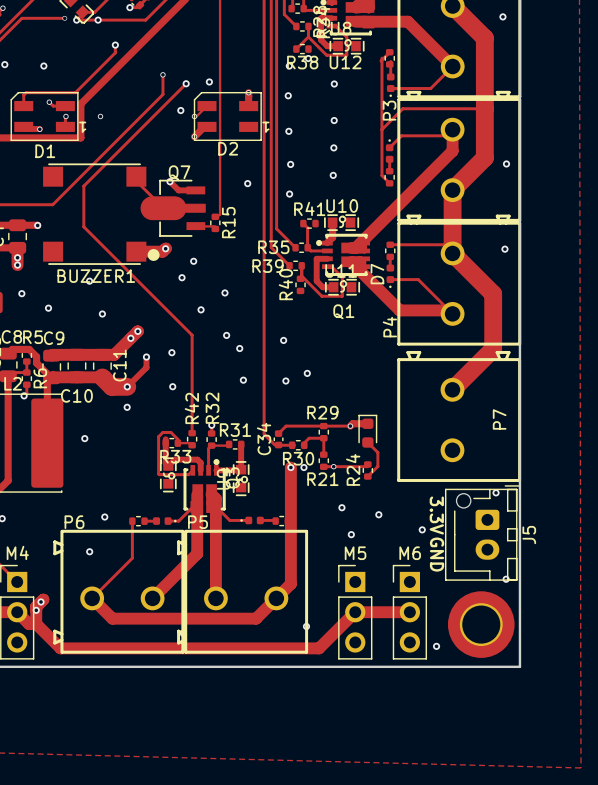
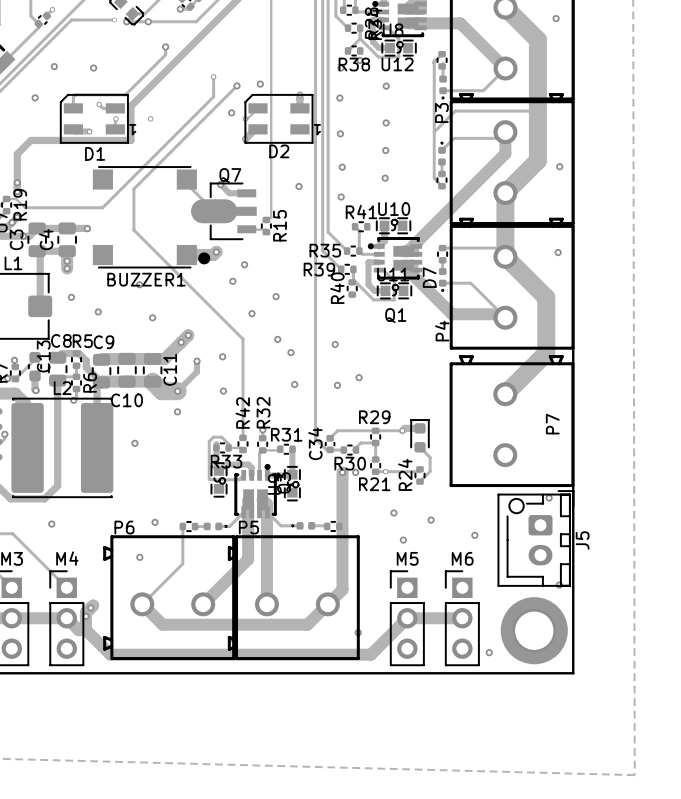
text: 3.3V (436, 515) -> none
text: GND (437, 554) -> none

